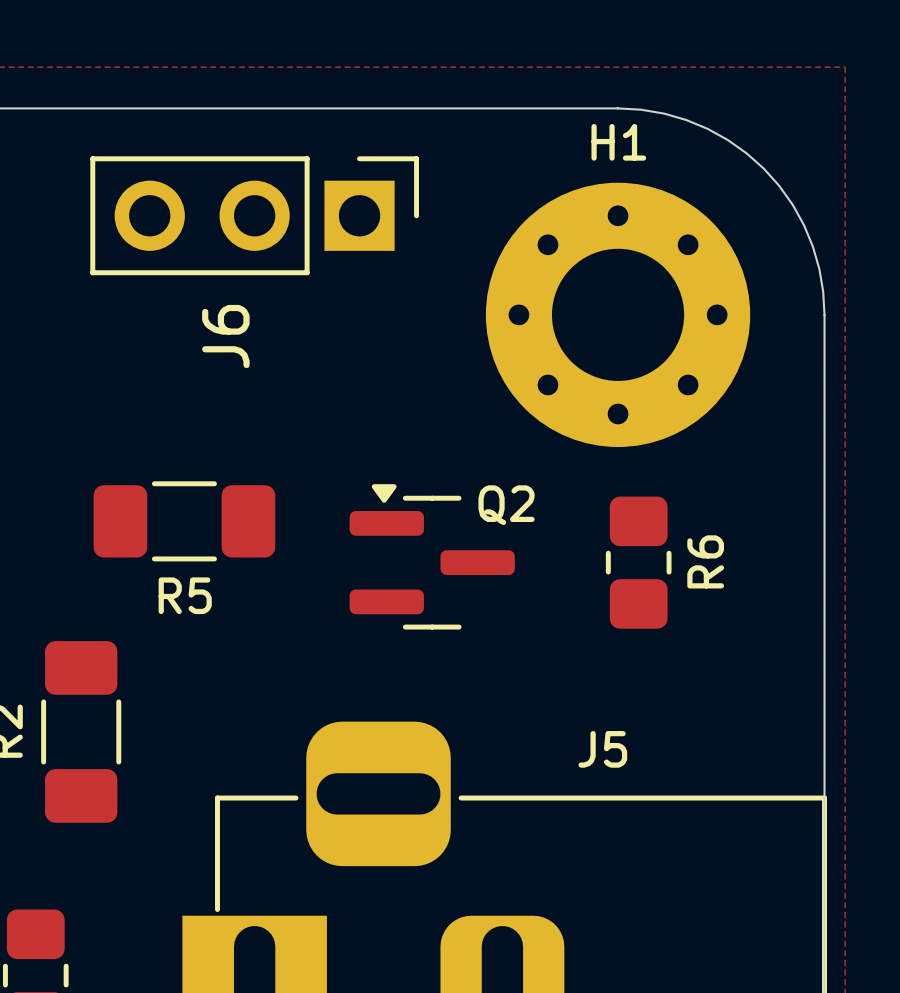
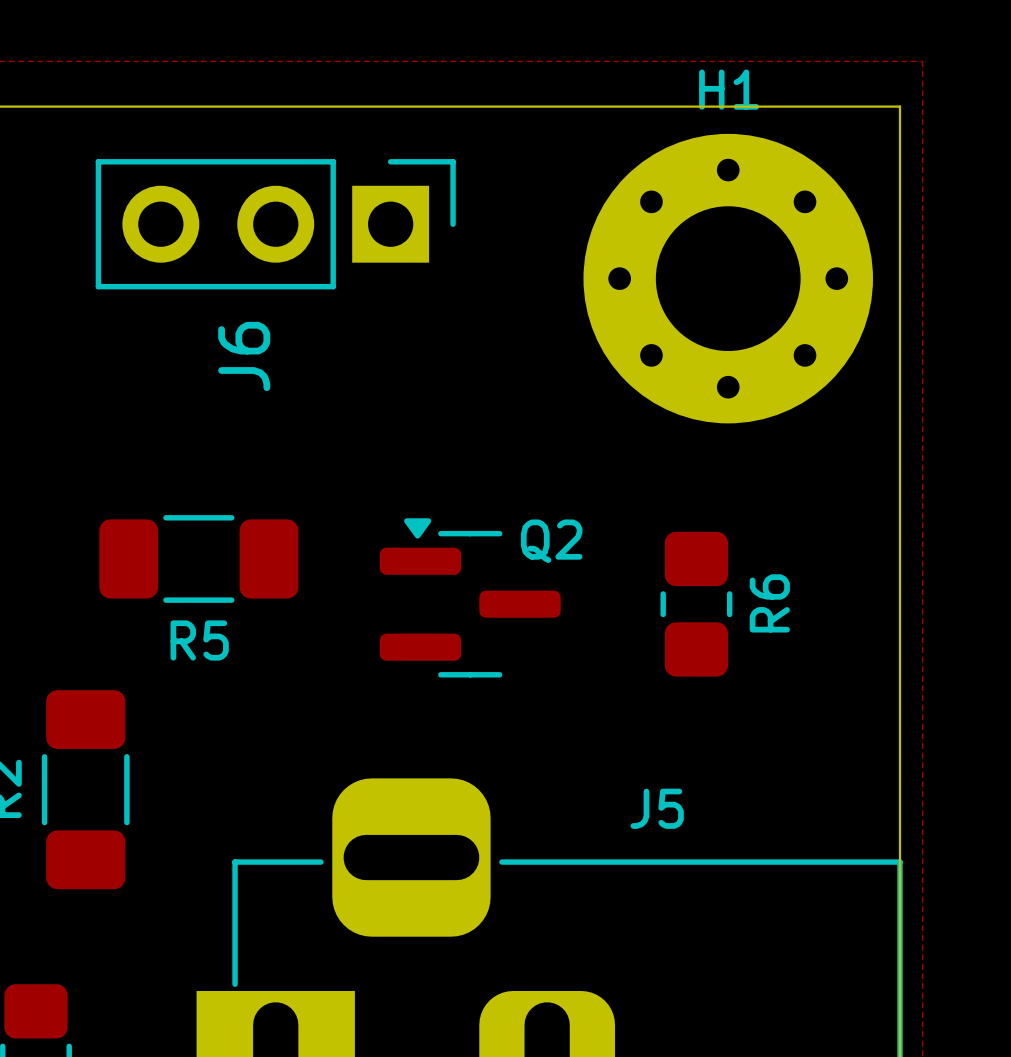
board edge: (618, 108) (641, 109) (686, 119) (727, 140) (764, 168) (792, 205) (812, 246) (823, 291) (824, 314) -> (673, 106) (900, 106) (900, 332)
H1 position: (618, 314) -> (728, 278)

